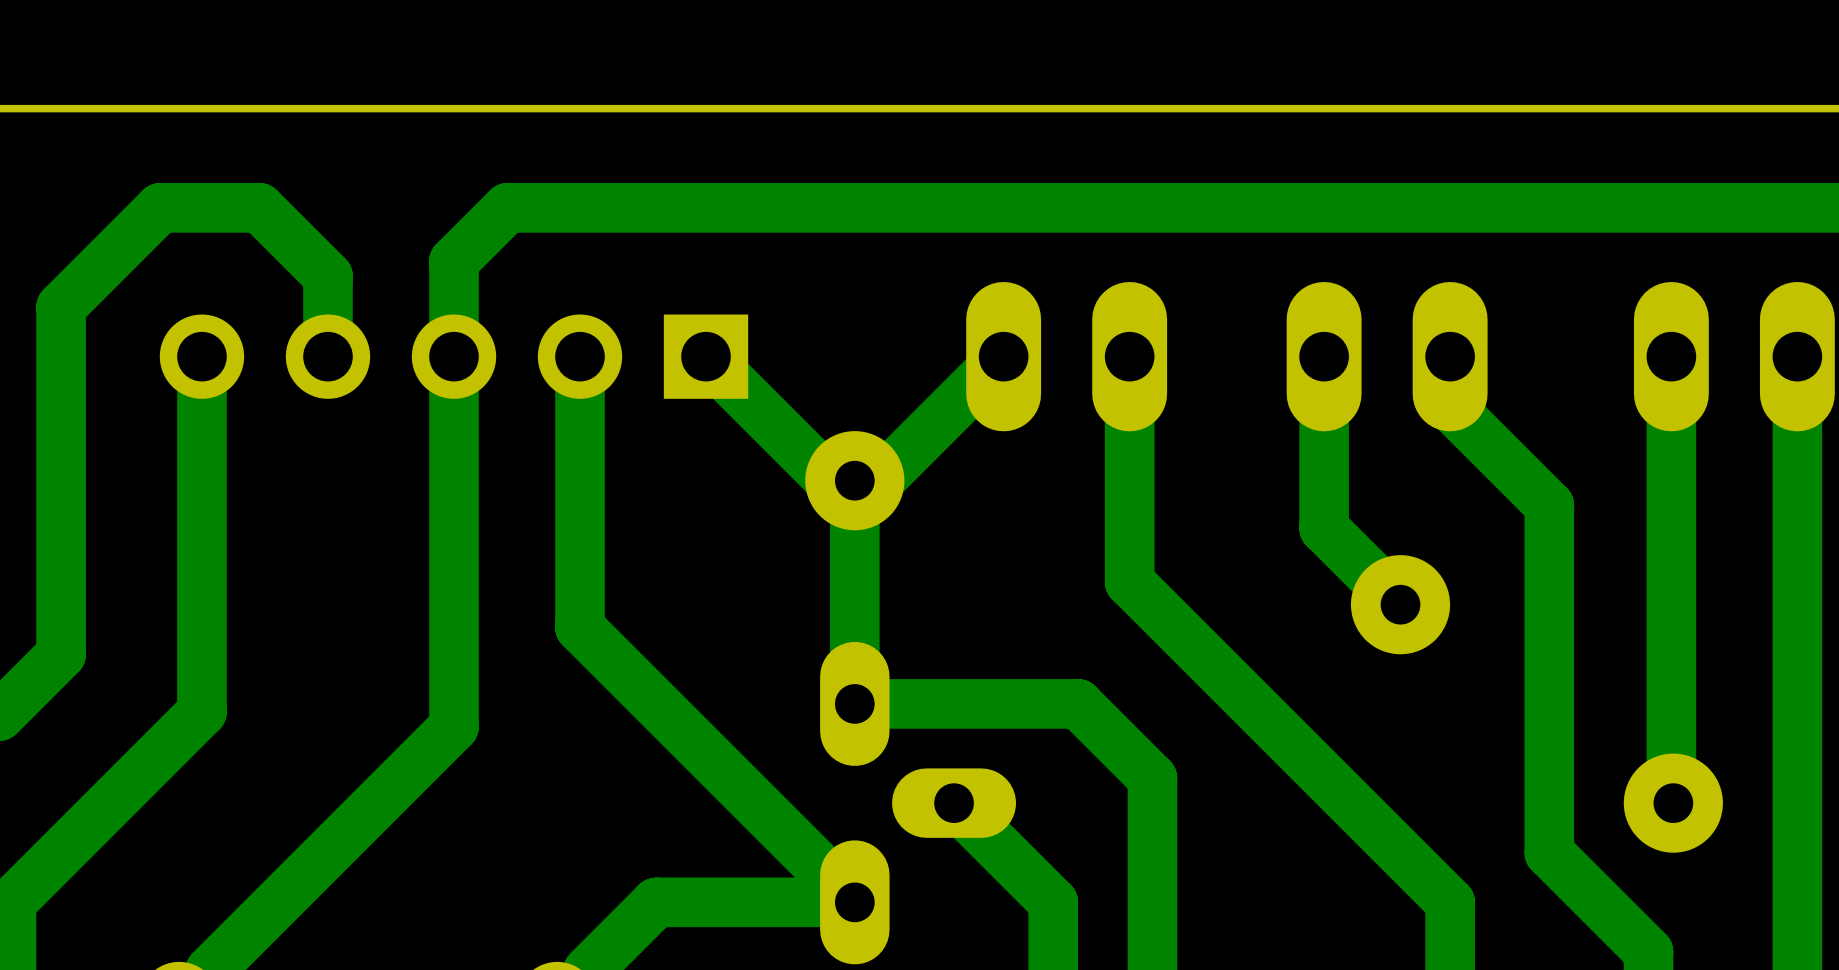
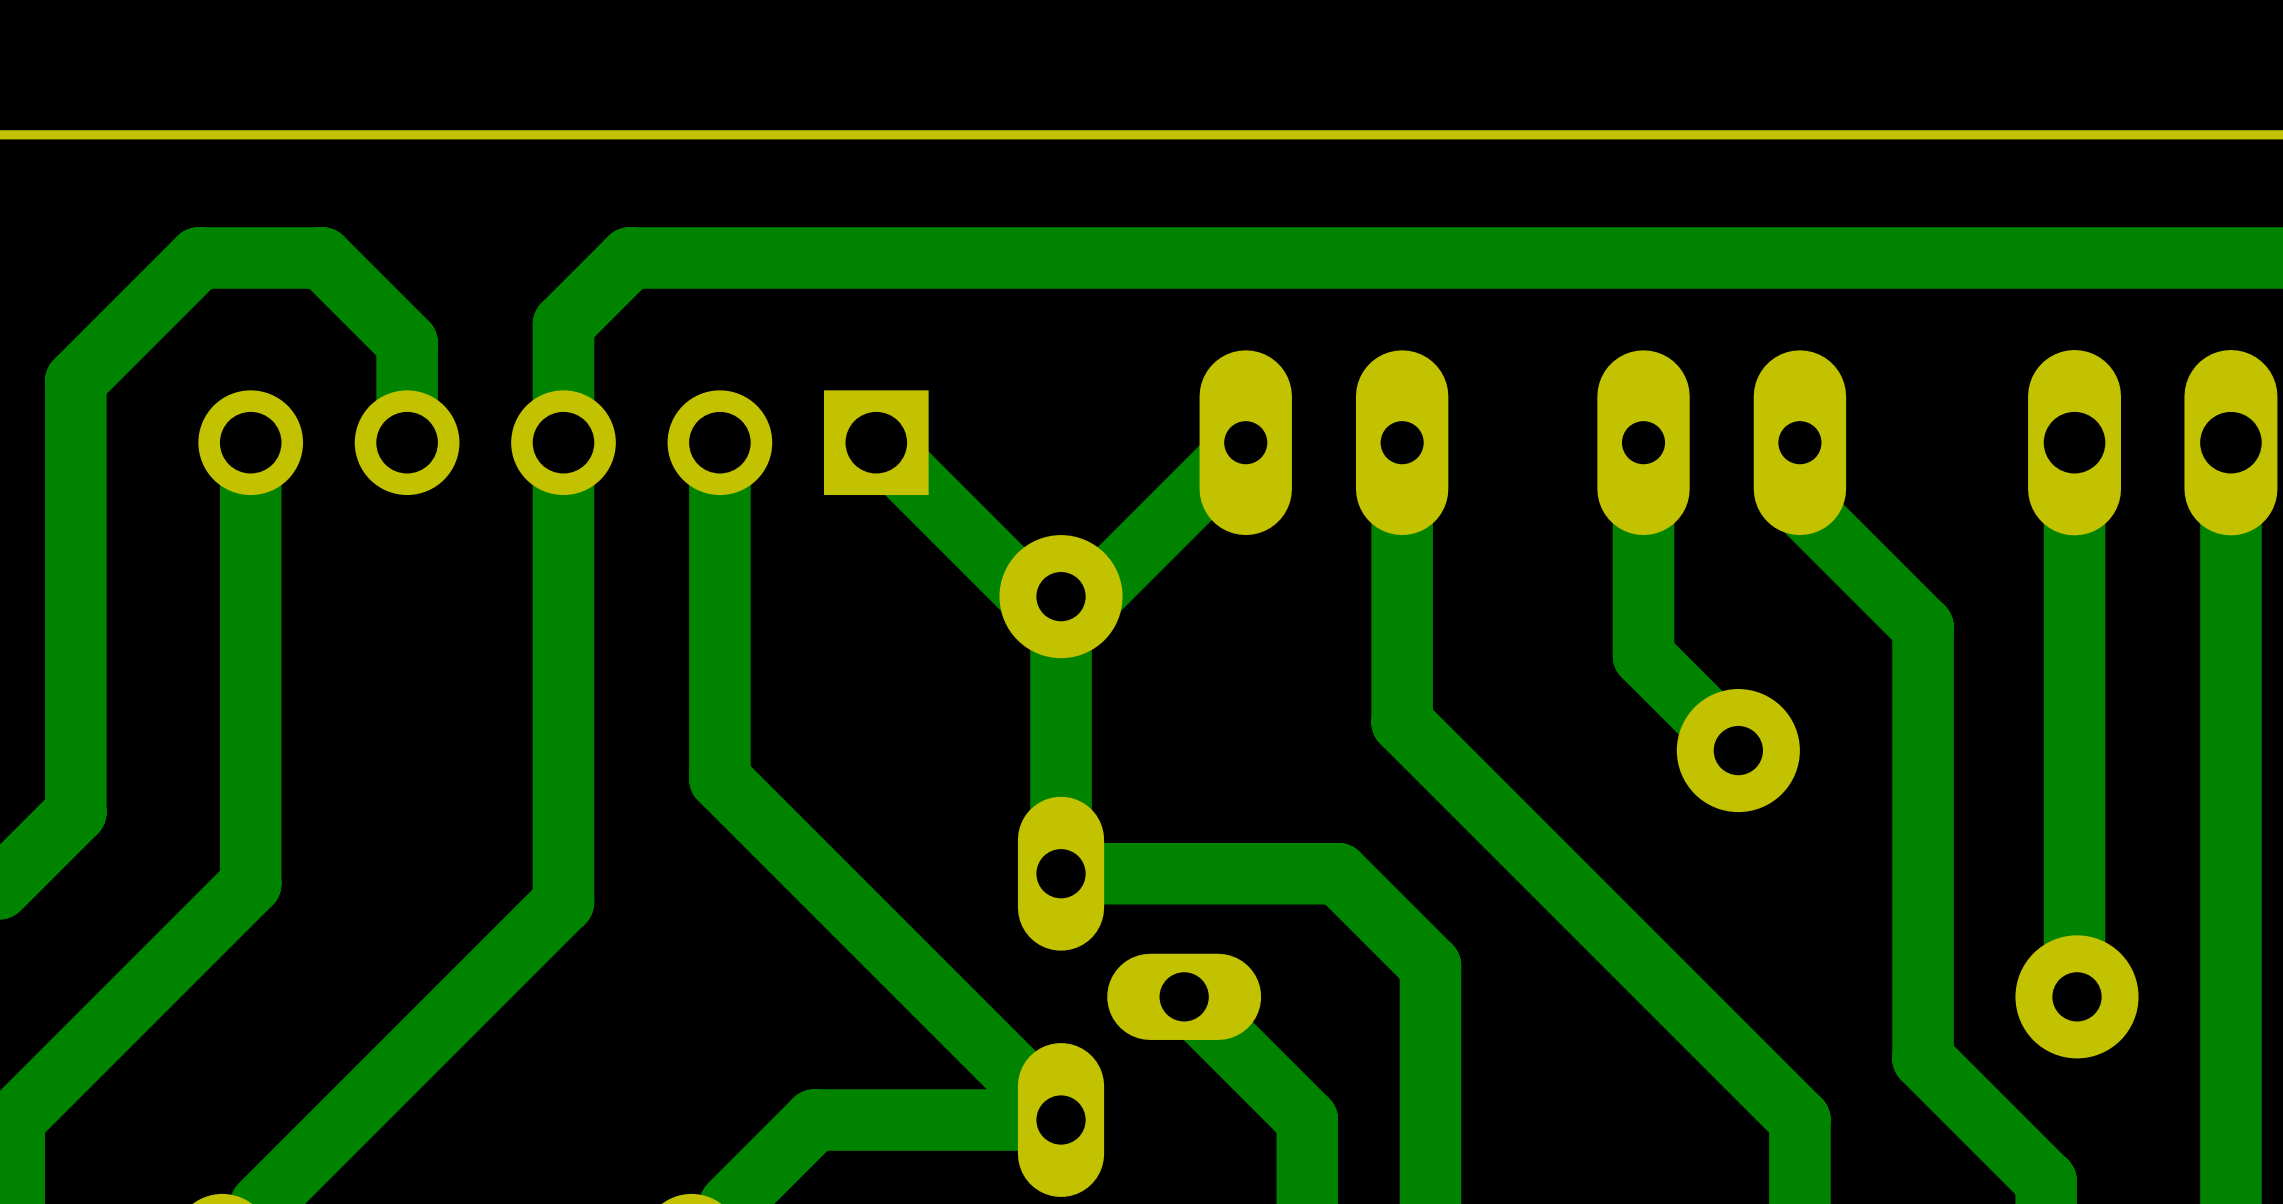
part footprint: [966, 282, 1168, 432] -> [1199, 350, 1449, 536]
part footprint: [1286, 282, 1488, 432] -> [1597, 350, 1847, 536]

